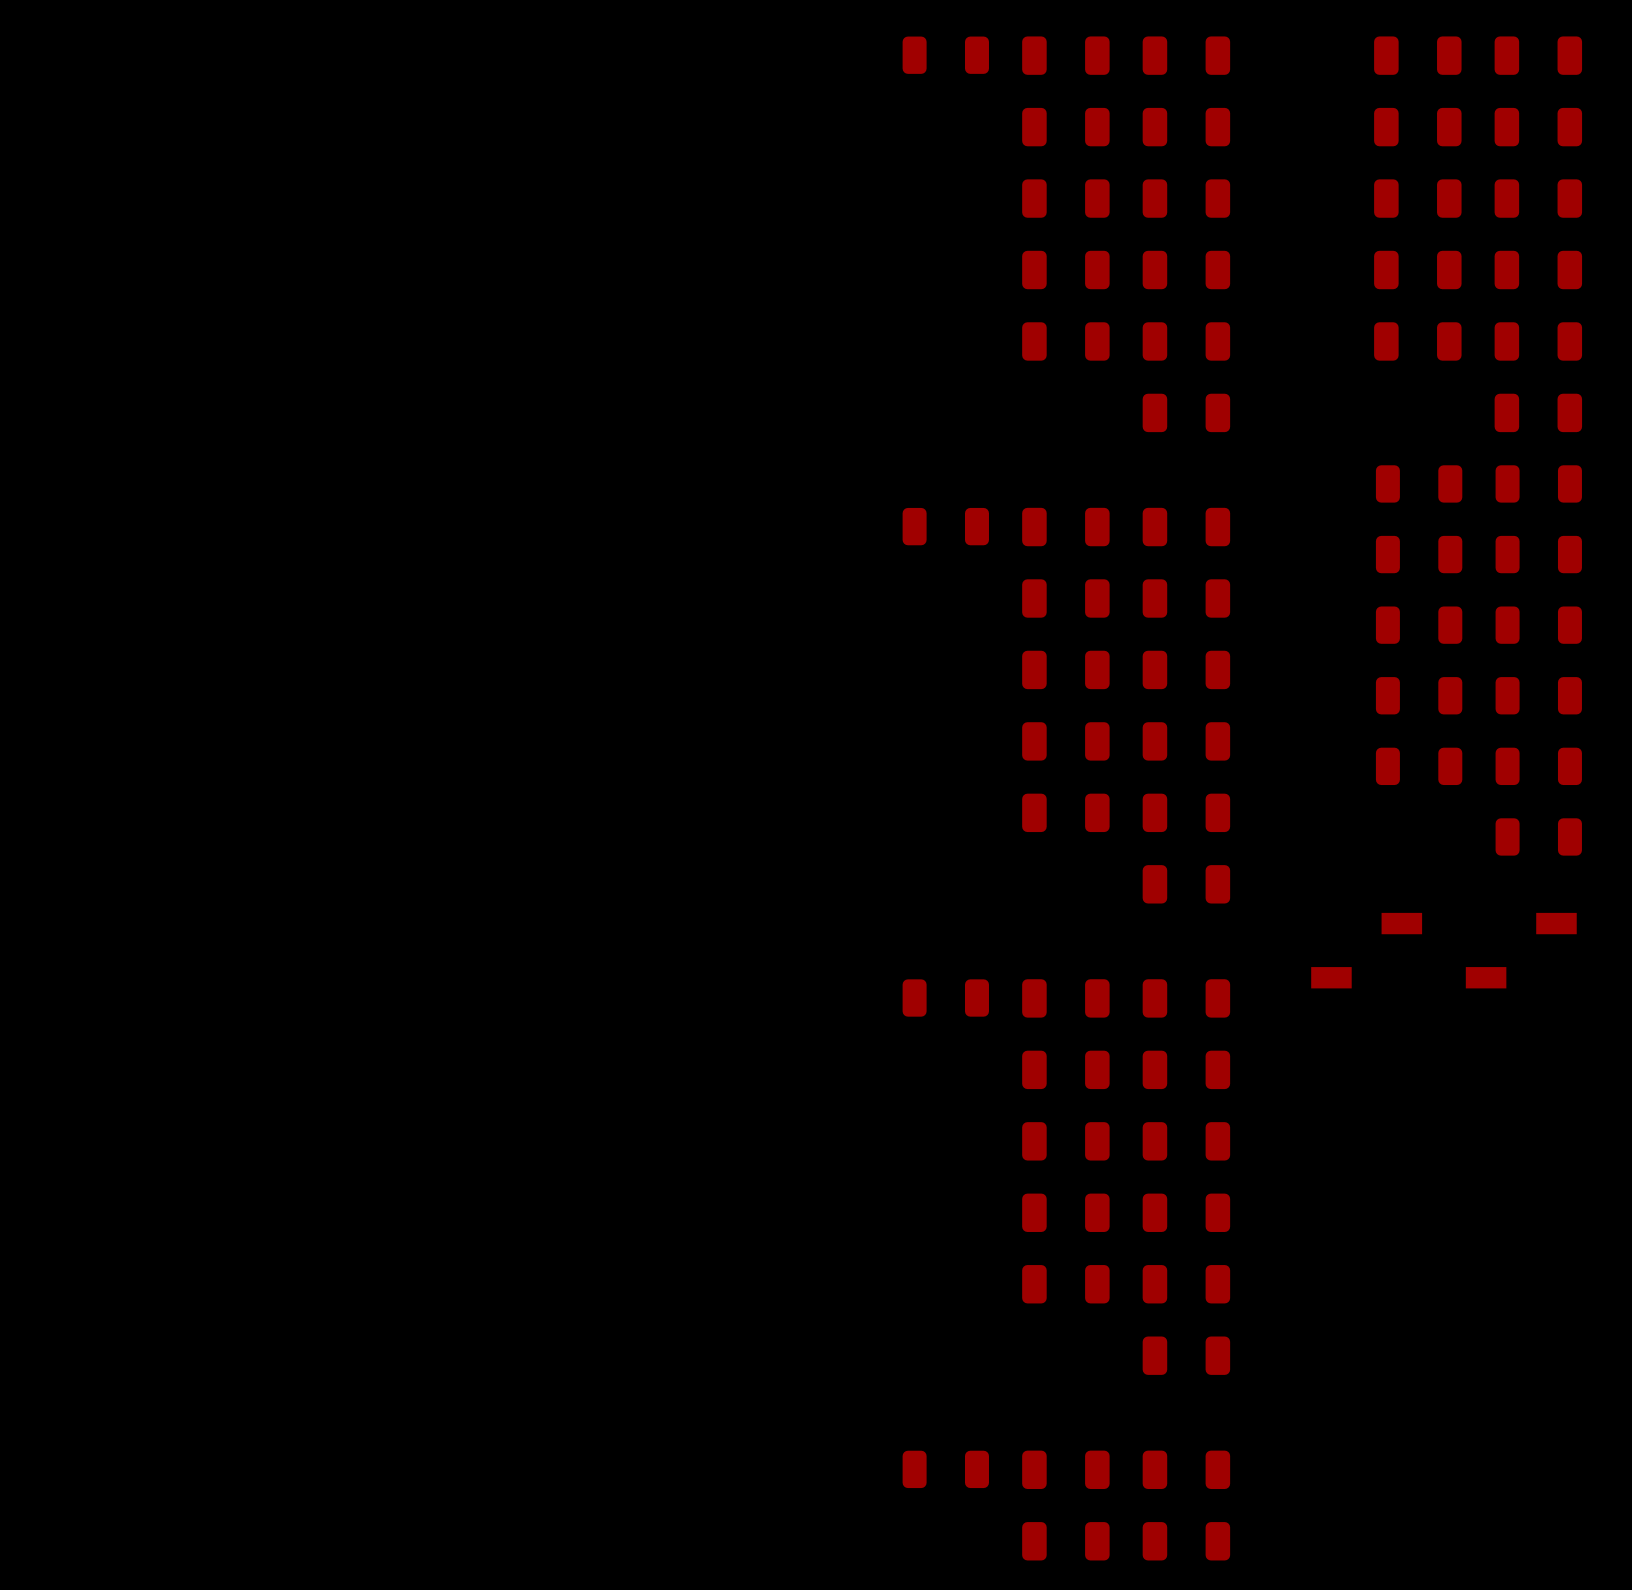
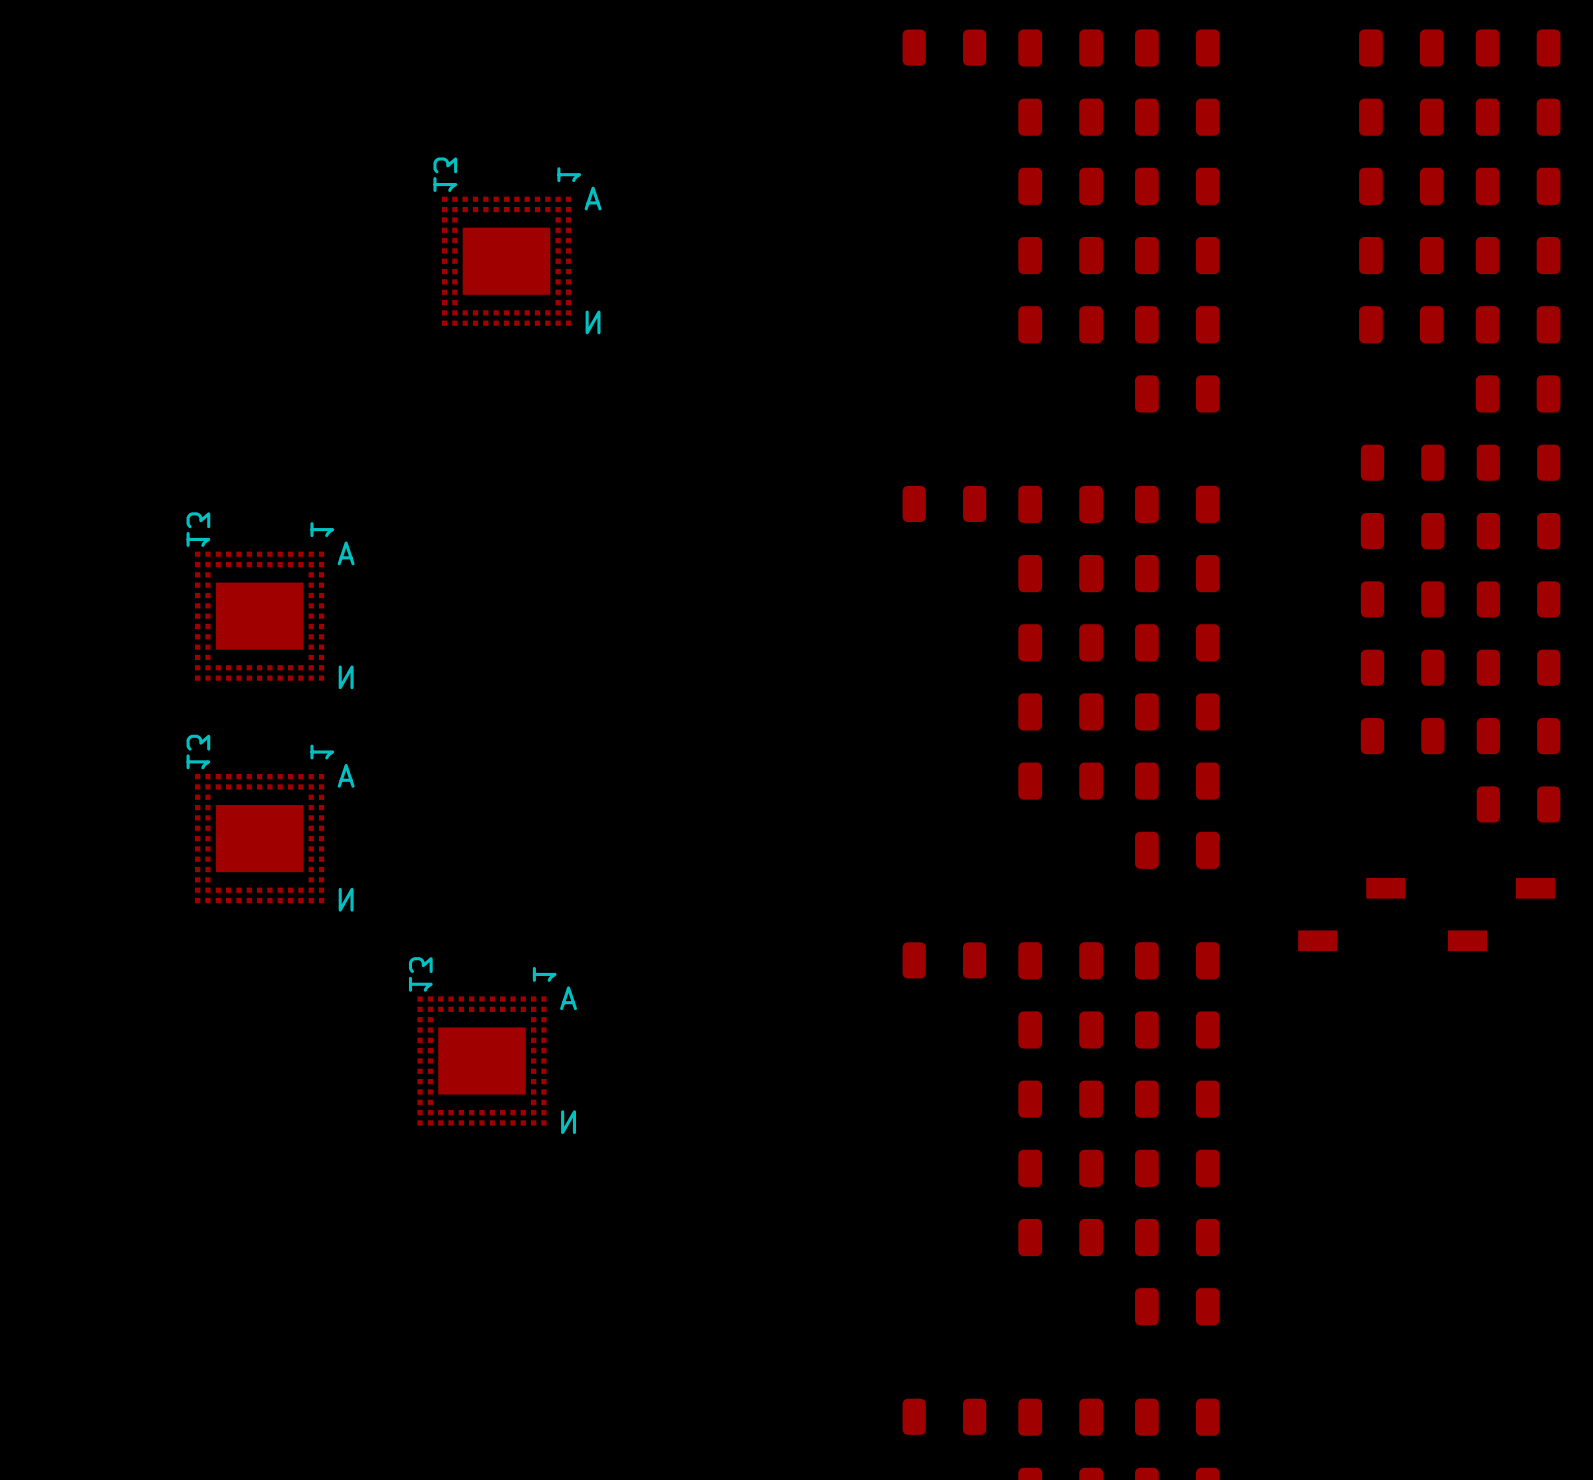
part: none -> (506, 261)
part: none -> (259, 616)
part: none -> (259, 838)
part: none -> (481, 1060)

